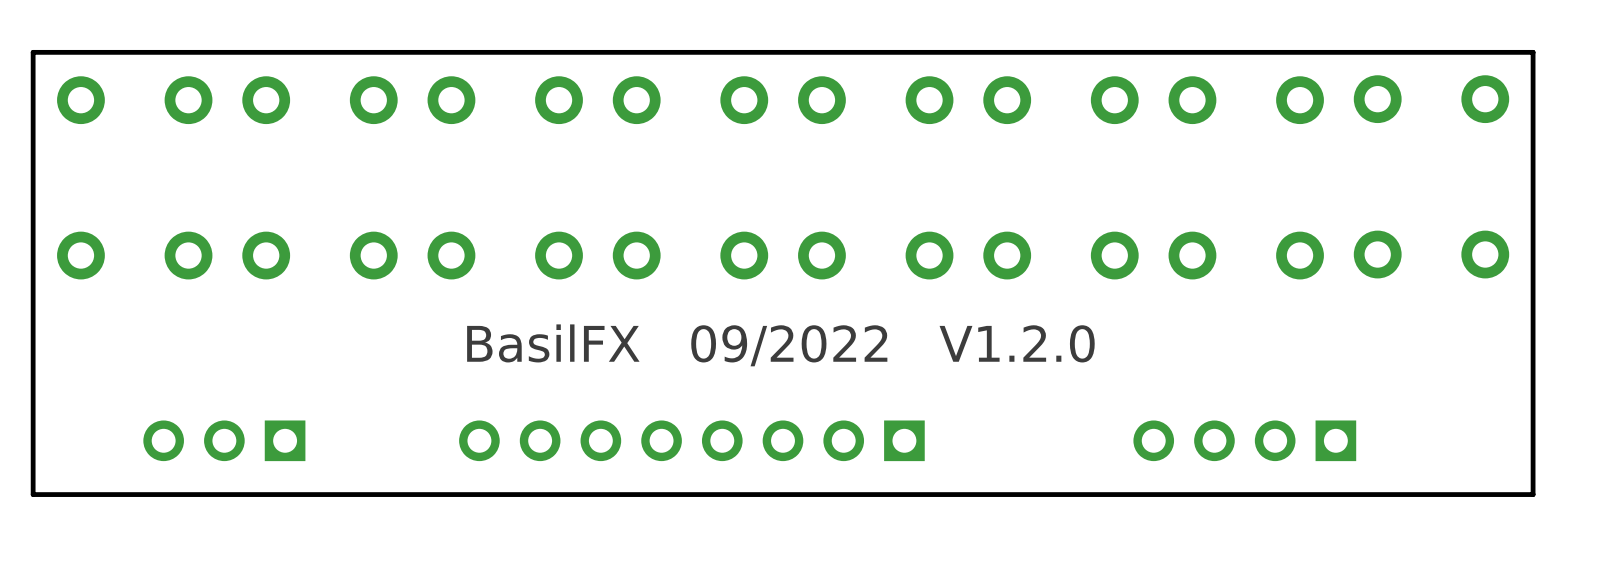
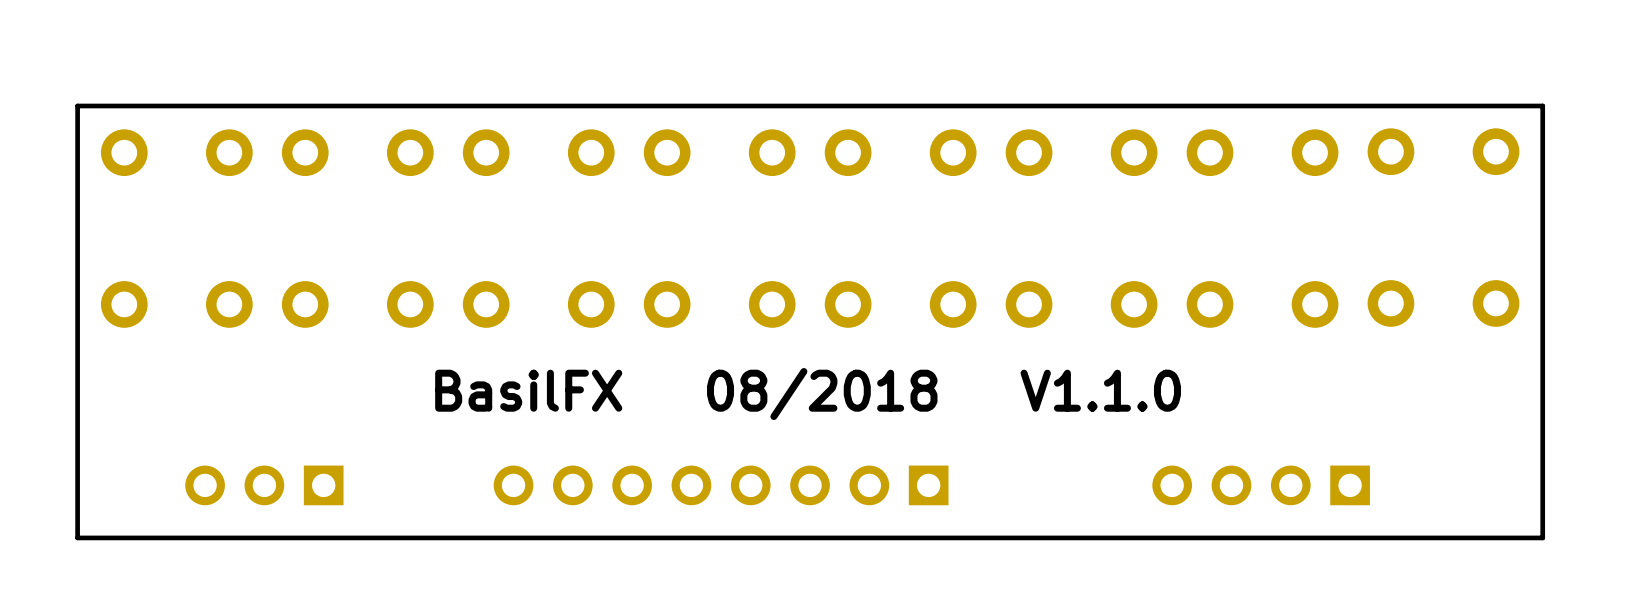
text: BasilFX 09/2022 V1.2.0 (780, 345) -> BasilFX 08/2018 V1.1.0 (808, 394)

